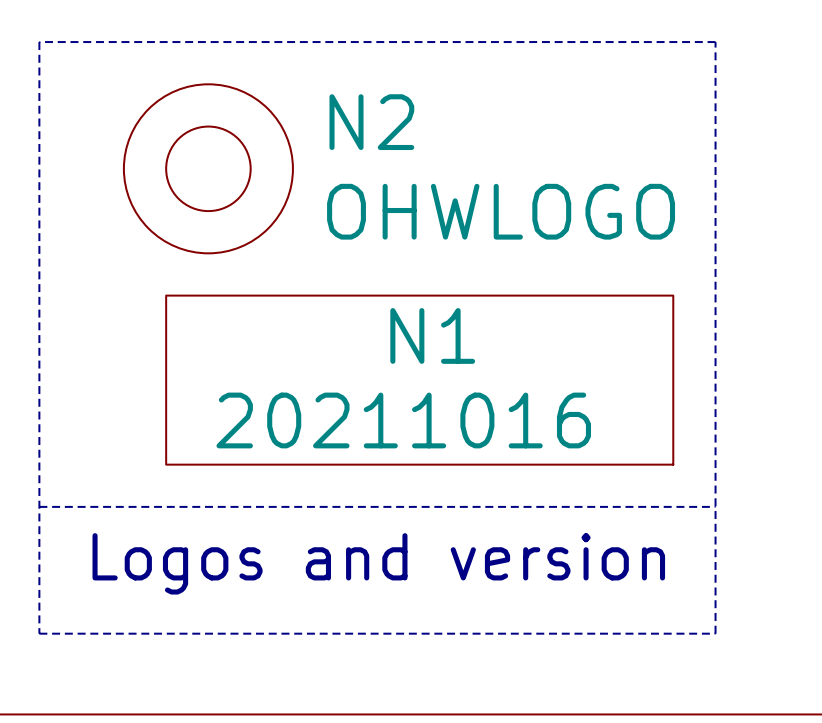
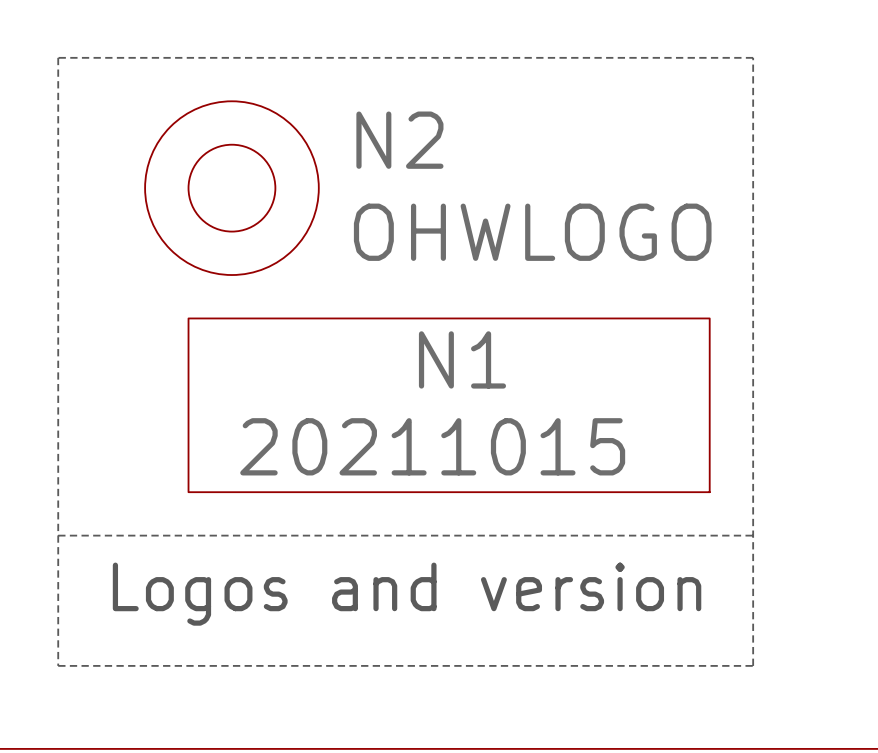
N1 value: 20211016 (403, 420) -> 20211015 (432, 446)

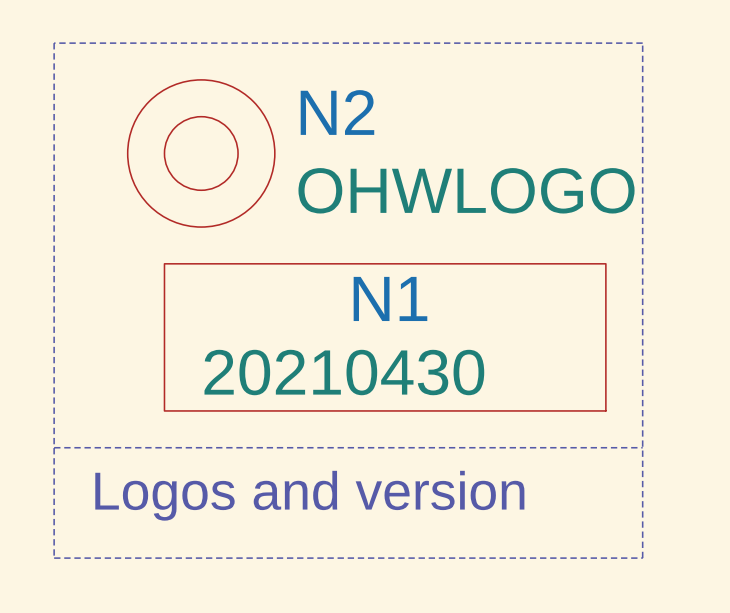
N1 value: 20211015 (432, 446) -> 20210430 (344, 372)

